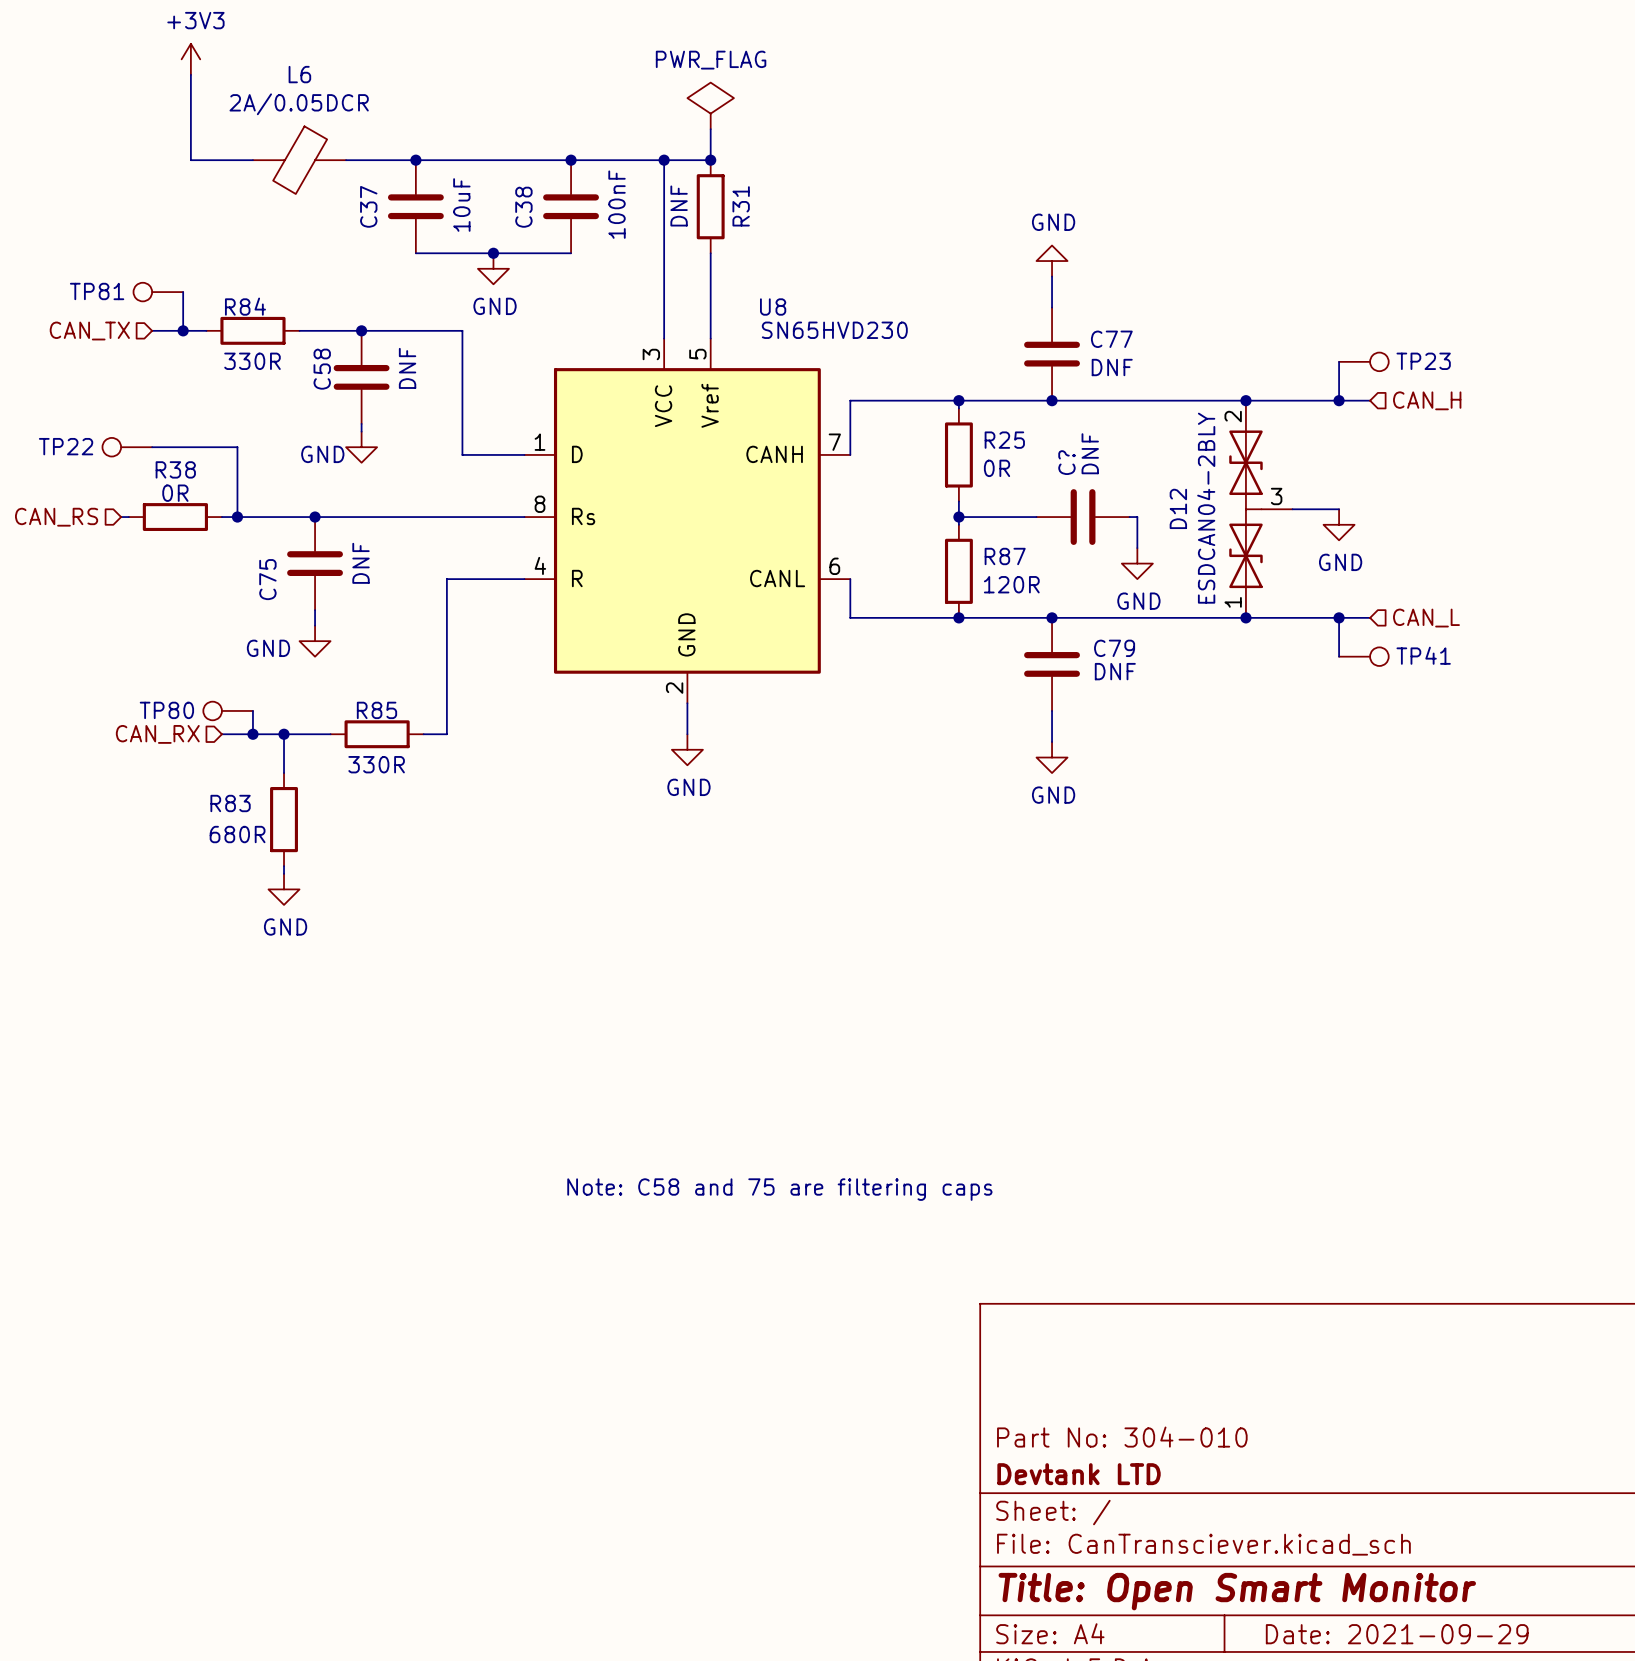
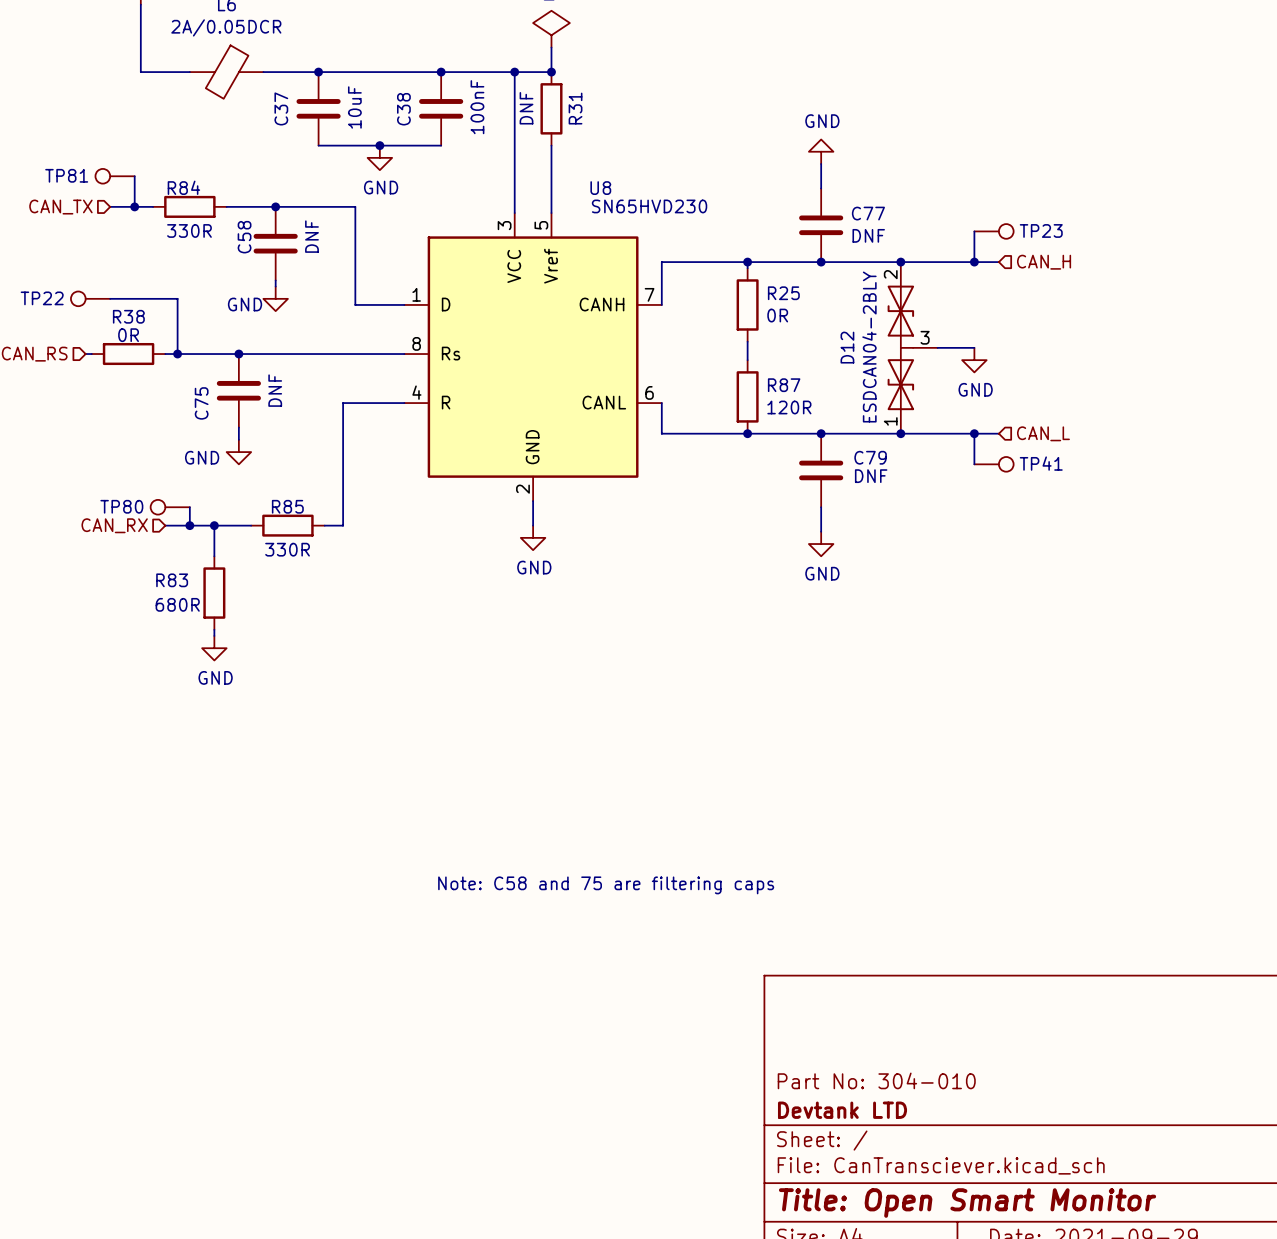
wire: (1339, 361) (1339, 400) -> (974, 231) (974, 262)
TP23 position: (1363, 361) -> (994, 231)
junction: none -> (900, 262)
wire: (1277, 400) (1370, 400) -> none
junction: (1339, 400) -> none
hierarchical label position: CAN_H (1427, 400) -> CAN_H (1044, 262)
D12 position: (1260, 509) -> (912, 347)
wire: (1292, 509) (1339, 509) -> (937, 347) (974, 347)
wire: (958, 517) (1036, 517) -> none
junction: (958, 517) -> none
C?: DNF (1083, 517) -> none
wire: (1129, 517) (1137, 517) (1137, 548) -> none
power symbol: none -> GND (974, 360)
power symbol: GND (1339, 524) -> none
power symbol: GND (1137, 563) -> none
junction: none -> (900, 433)
wire: (1277, 617) (1370, 617) -> none
wire: (1339, 617) (1339, 656) -> (974, 433) (974, 464)
junction: (1339, 617) -> none
hierarchical label position: CAN_L (1426, 618) -> CAN_L (1043, 433)
TP41 position: (1363, 656) -> (994, 464)

